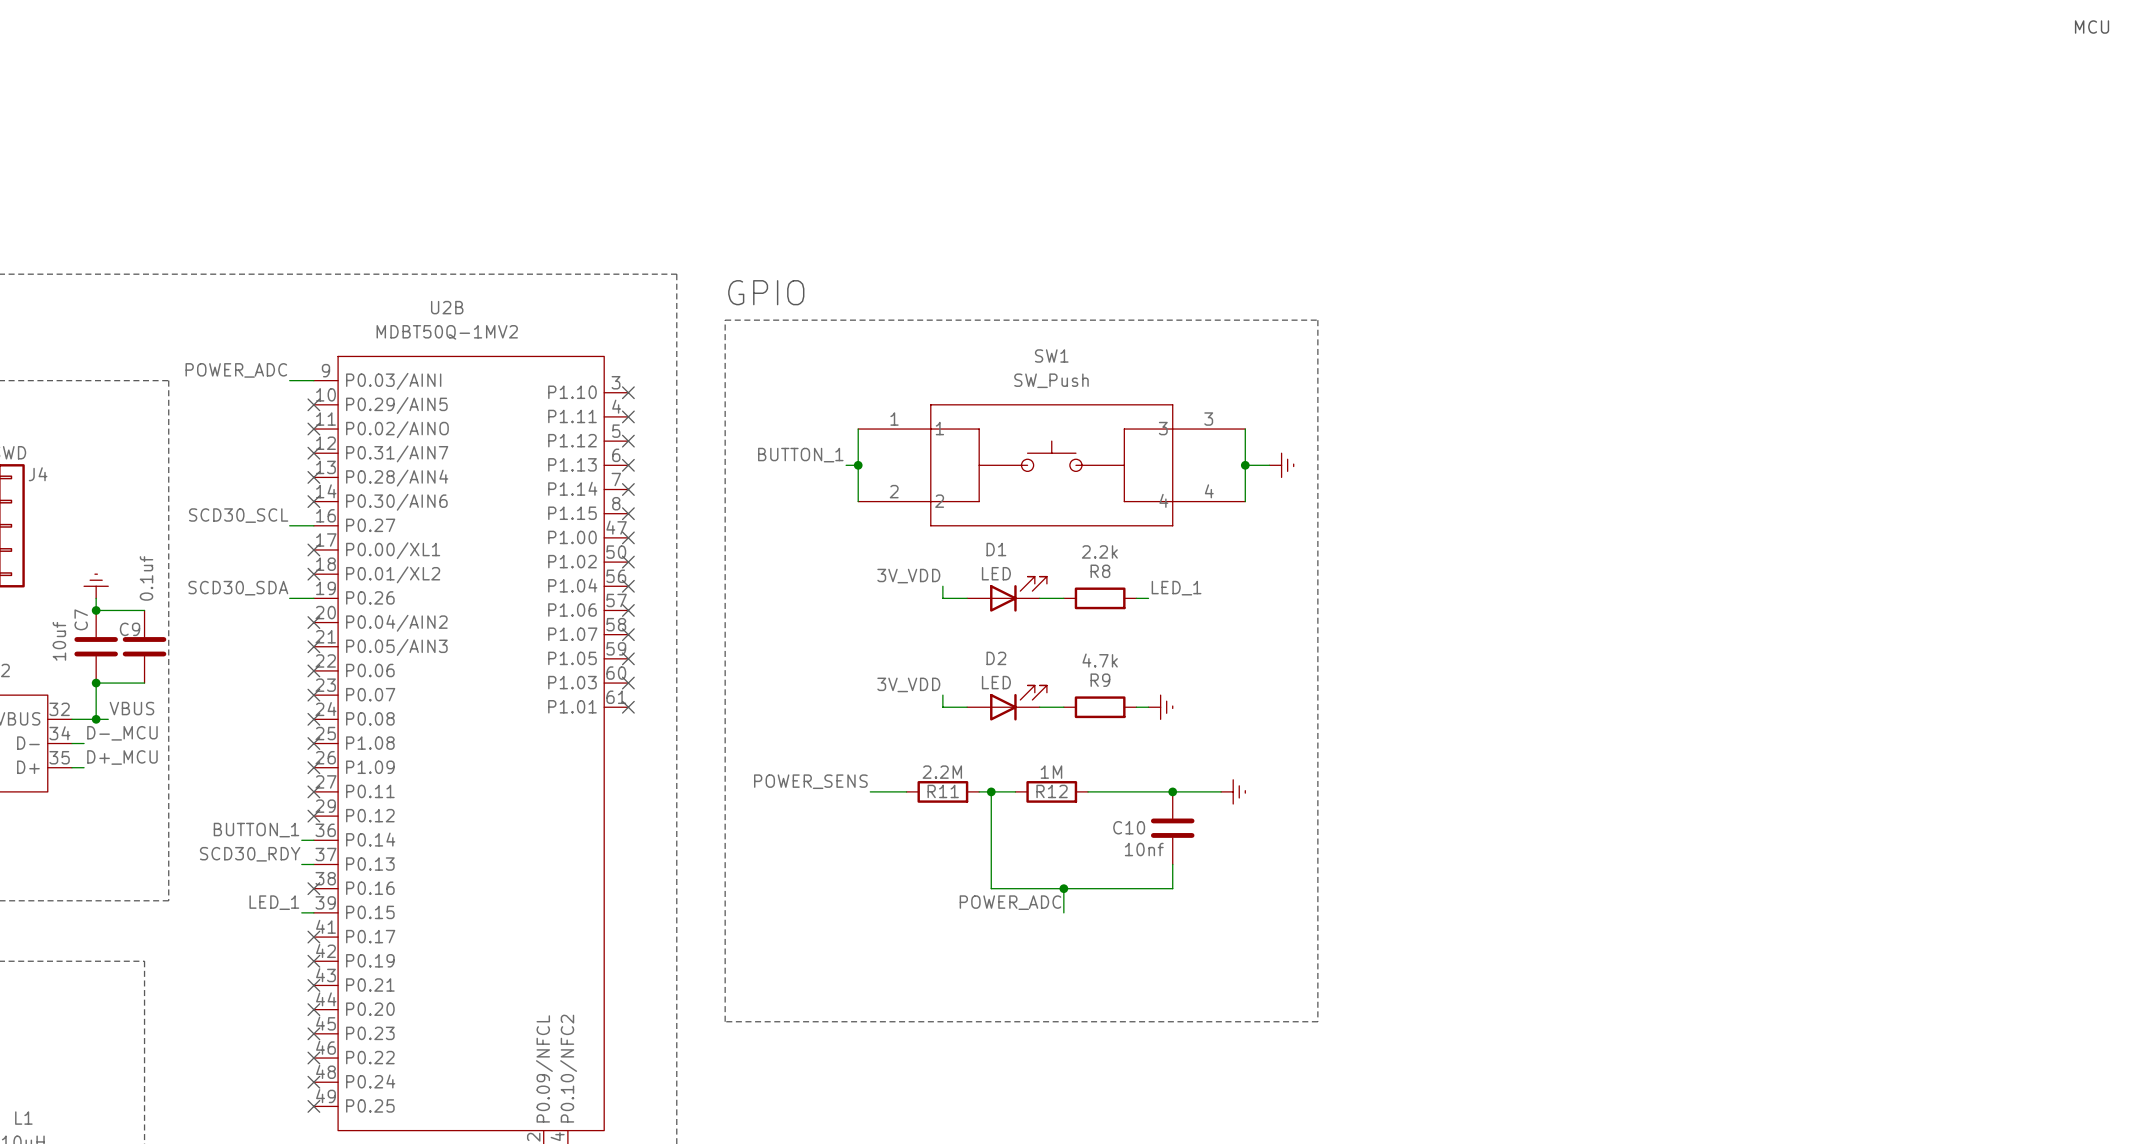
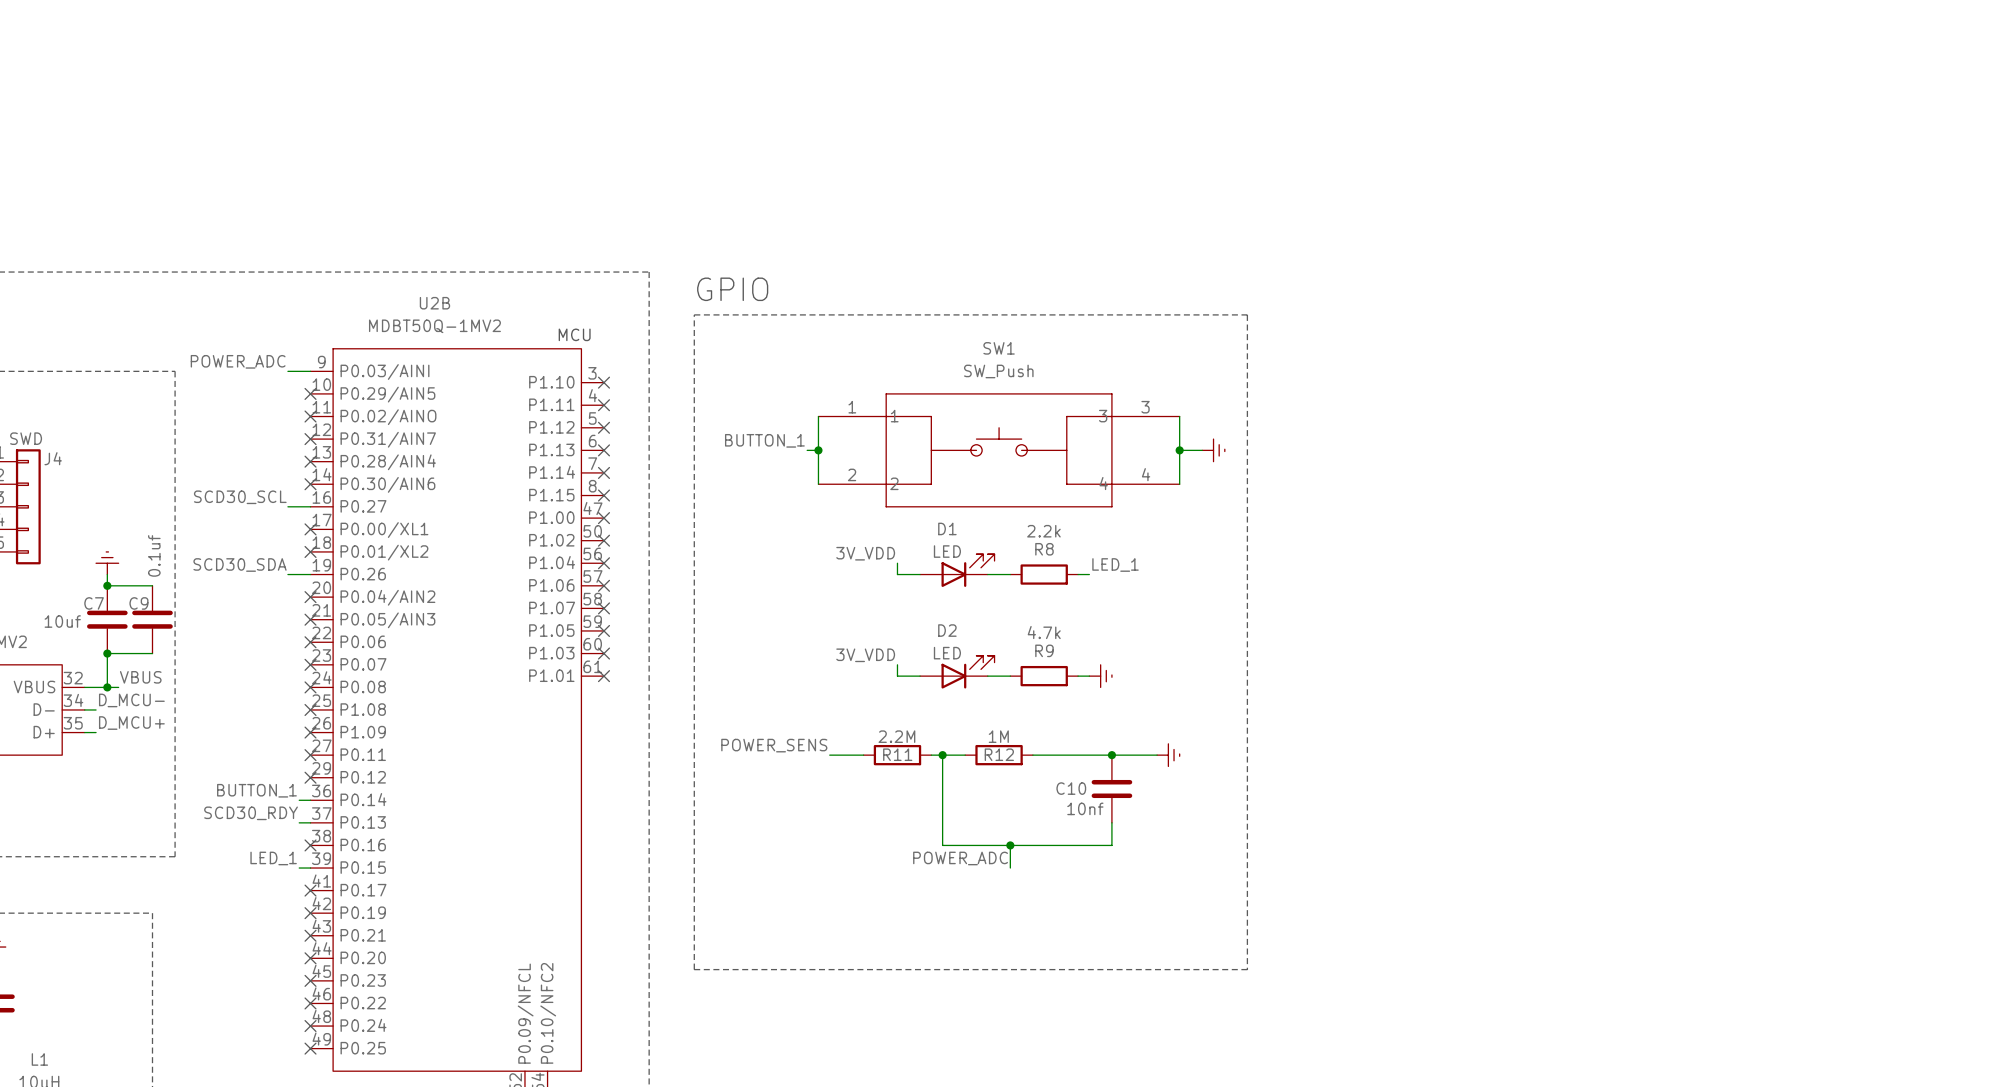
text: MCU (2092, 27) -> none
text: none -> MCU (574, 334)
C7 name rotation: 0° (81, 619) -> 90° clockwise (94, 603)
C7 value rotation: 0° (59, 641) -> 90° clockwise (62, 621)
label: D-_MCU (122, 733) -> D_MCU- (131, 700)
label: D+_MCU (122, 757) -> D_MCU+ (131, 723)

